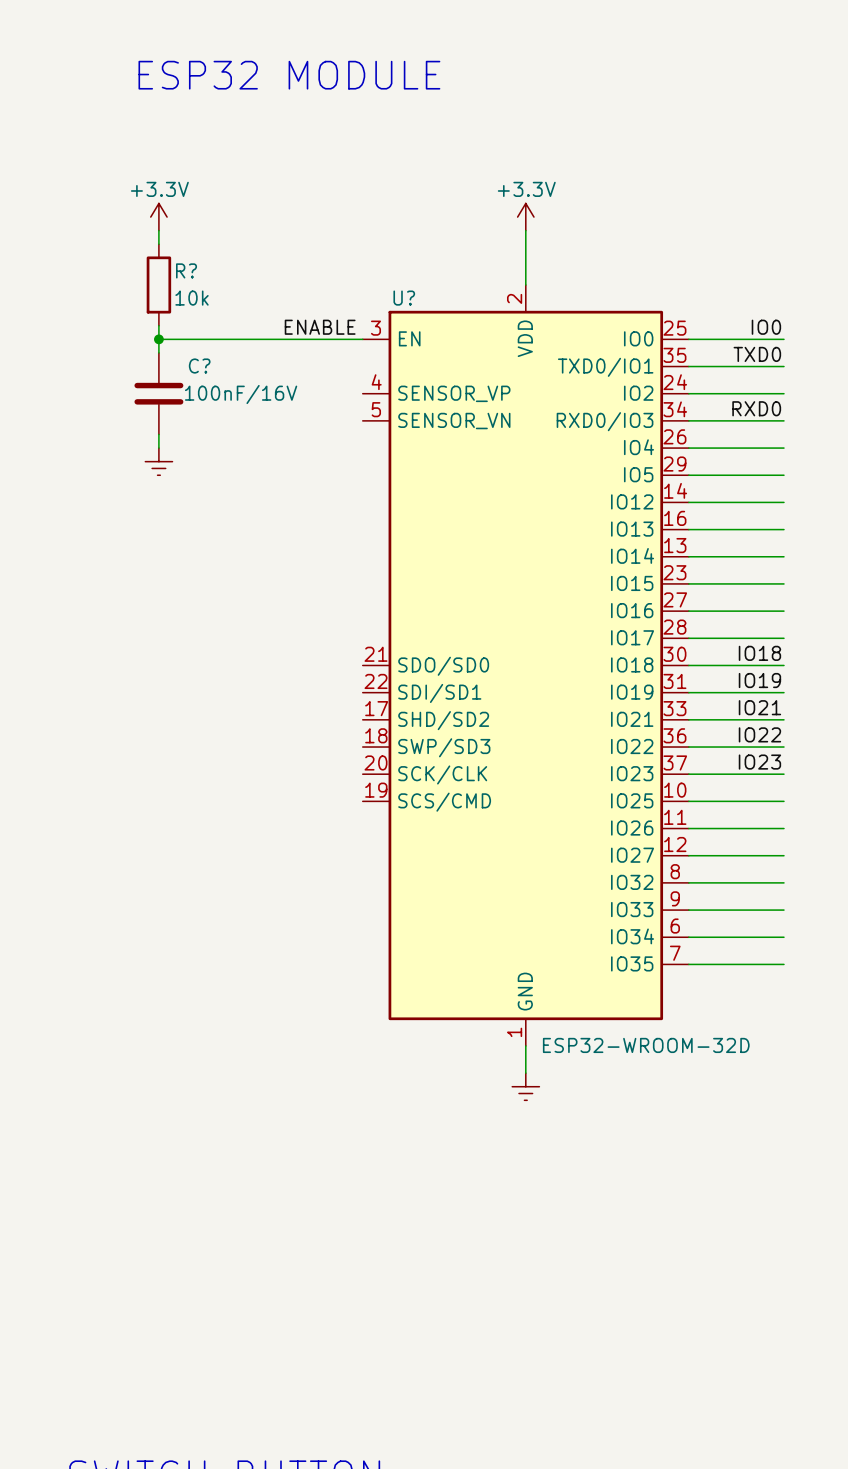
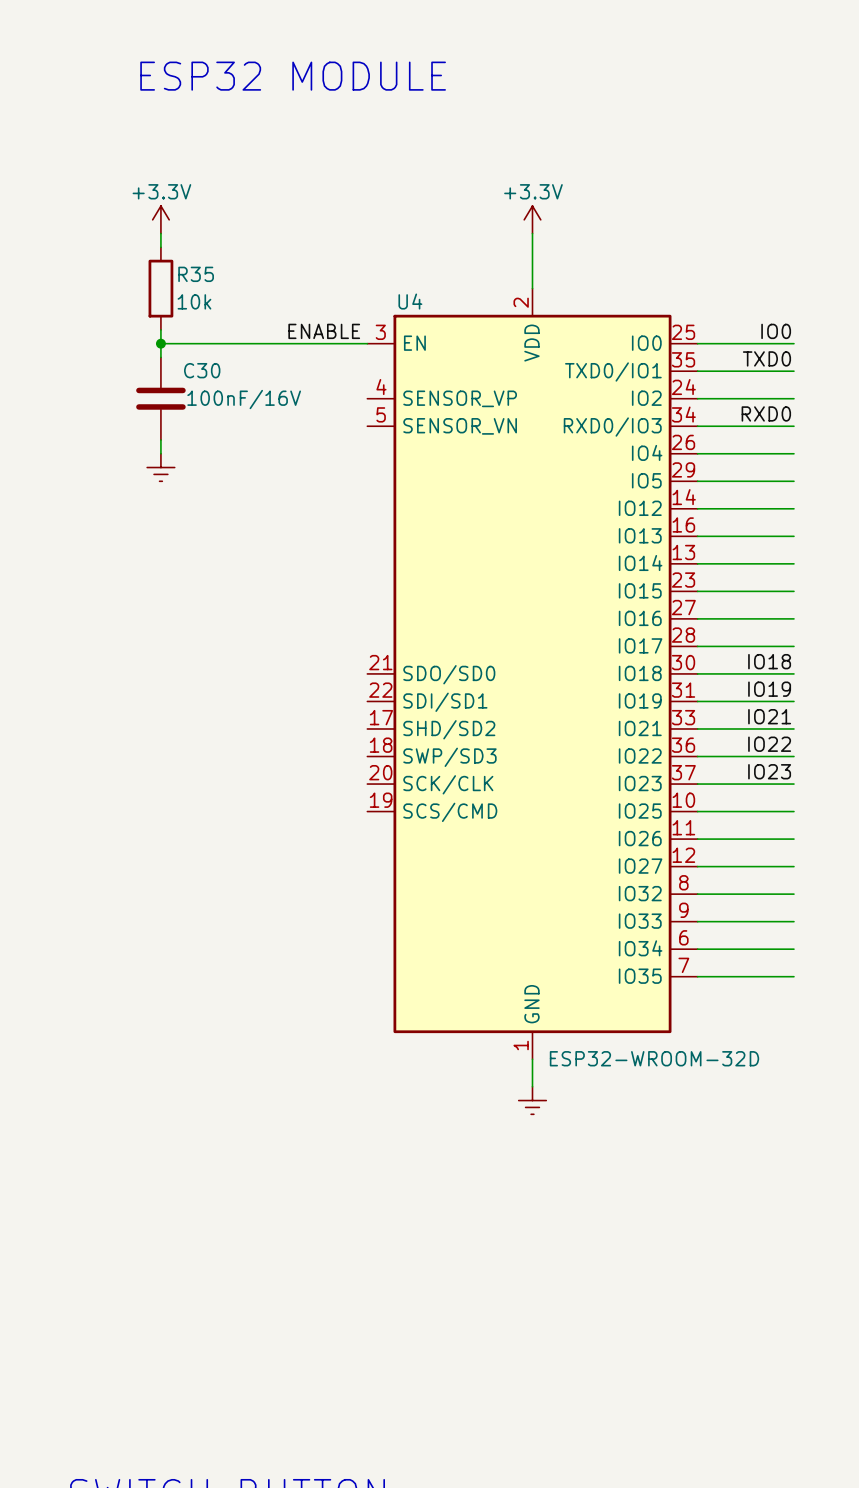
R? name: R? (186, 270) -> R35 (196, 274)
U? name: U? (404, 298) -> U4 (410, 301)
C? name: C? (199, 366) -> C30 (202, 370)

